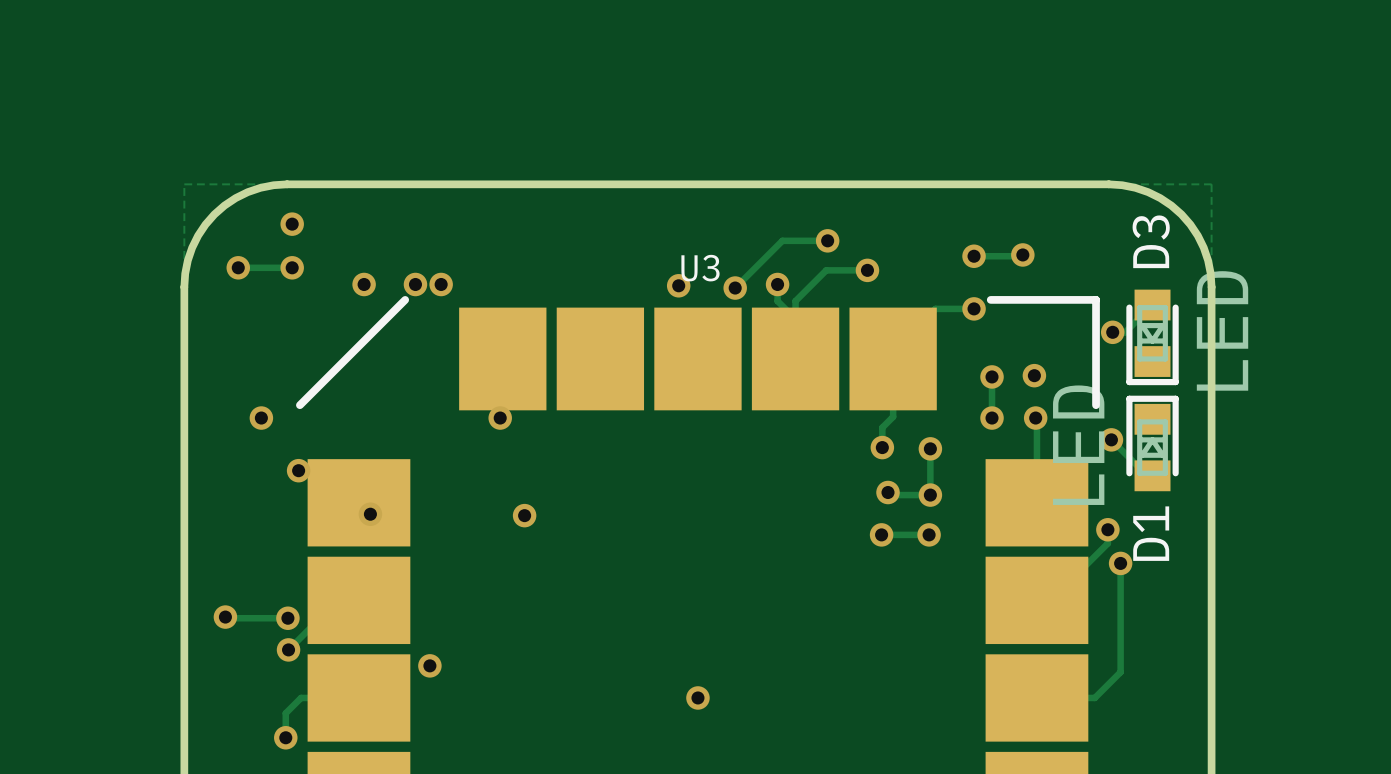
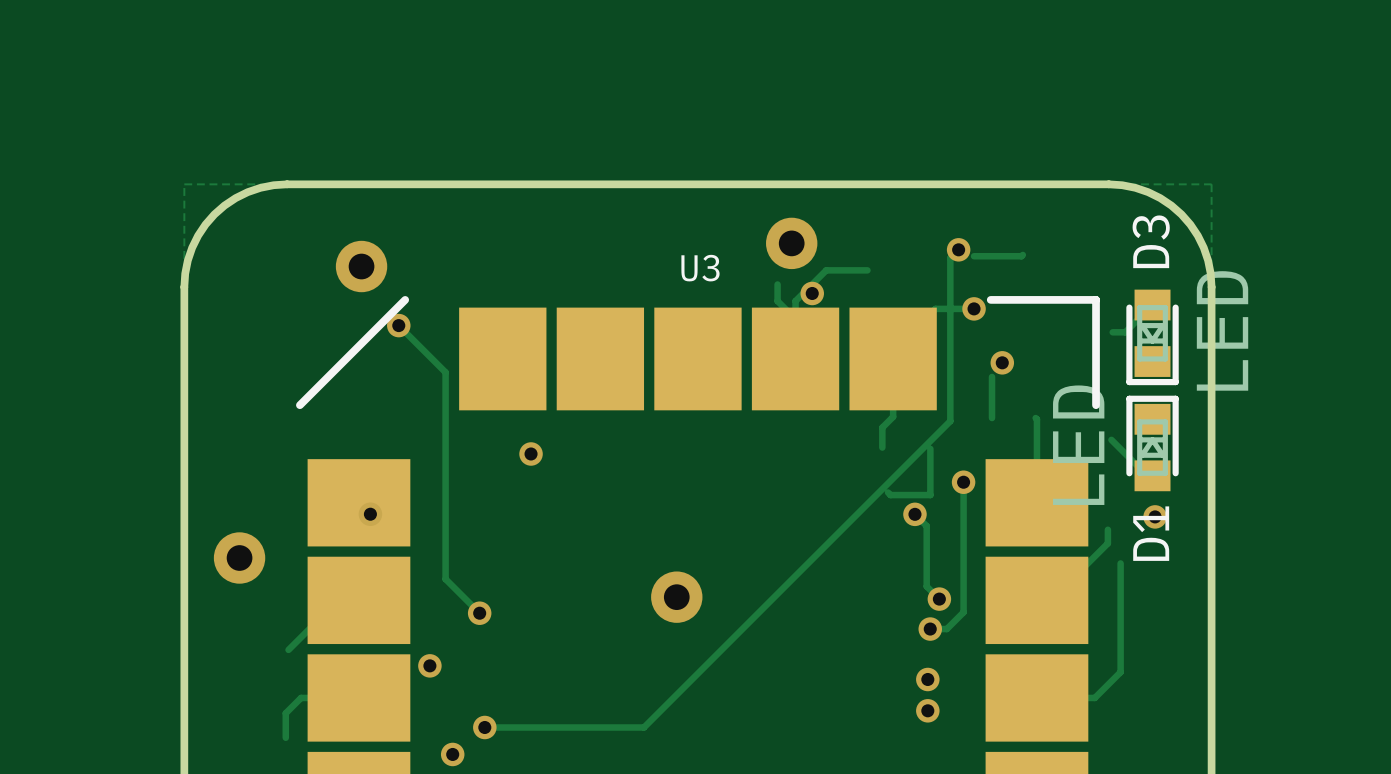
via: (292, 224) -> none
via size: [815, 229, 840, 253] -> [766, 217, 818, 270]
track: (827, 240) (782, 240) (735, 288) -> none
track: none -> (958, 249) (950, 258) (950, 421) (643, 727) (484, 727)
via: (1022, 254) -> none
via position: (974, 256) -> (958, 249)
track: (238, 267) (292, 267) -> none
via: (238, 267) -> none
via: (292, 267) -> none
via: (867, 270) -> none
via size: [352, 272, 376, 297] -> [335, 240, 388, 293]
via: (415, 284) -> none
via: (441, 284) -> none
via: (777, 284) -> none
via: (678, 285) -> none
via: (735, 288) -> none
via: none -> (812, 293)
track: none -> (398, 325) (445, 372) (445, 579) (479, 613)
via: none -> (398, 325)
via: (1112, 332) -> none
via: (1034, 375) -> none
via position: (992, 376) -> (1002, 362)
via: (261, 418) -> none
via: (500, 418) -> none
via: (992, 418) -> none
via: (1035, 418) -> none
via: (1111, 439) -> none
via: (882, 447) -> none
via: (930, 448) -> none
via: none -> (531, 453)
via: (298, 470) -> none
track: none -> (963, 482) (963, 612) (946, 629) (930, 629)
via: none -> (963, 482)
via: (888, 492) -> none
via: (930, 495) -> none
track: none -> (914, 514) (926, 526) (926, 586) (939, 599)
via: none -> (914, 514)
via: (524, 515) -> none
via: none -> (1155, 516)
via: (1107, 529) -> none
track: (881, 534) (929, 534) -> none
via: (881, 534) -> none
via: (929, 534) -> none
via: none -> (239, 558)
via: (1120, 563) -> none
via: none -> (676, 597)
via: none -> (939, 599)
via: none -> (479, 613)
track: (225, 617) (287, 618) -> none
via: (225, 617) -> none
via: (287, 618) -> none
via: none -> (930, 629)
via: (288, 649) -> none
via: none -> (927, 679)
via: (697, 697) -> none
via: none -> (927, 710)
via: none -> (484, 727)
via: (285, 737) -> none
via: none -> (452, 754)

